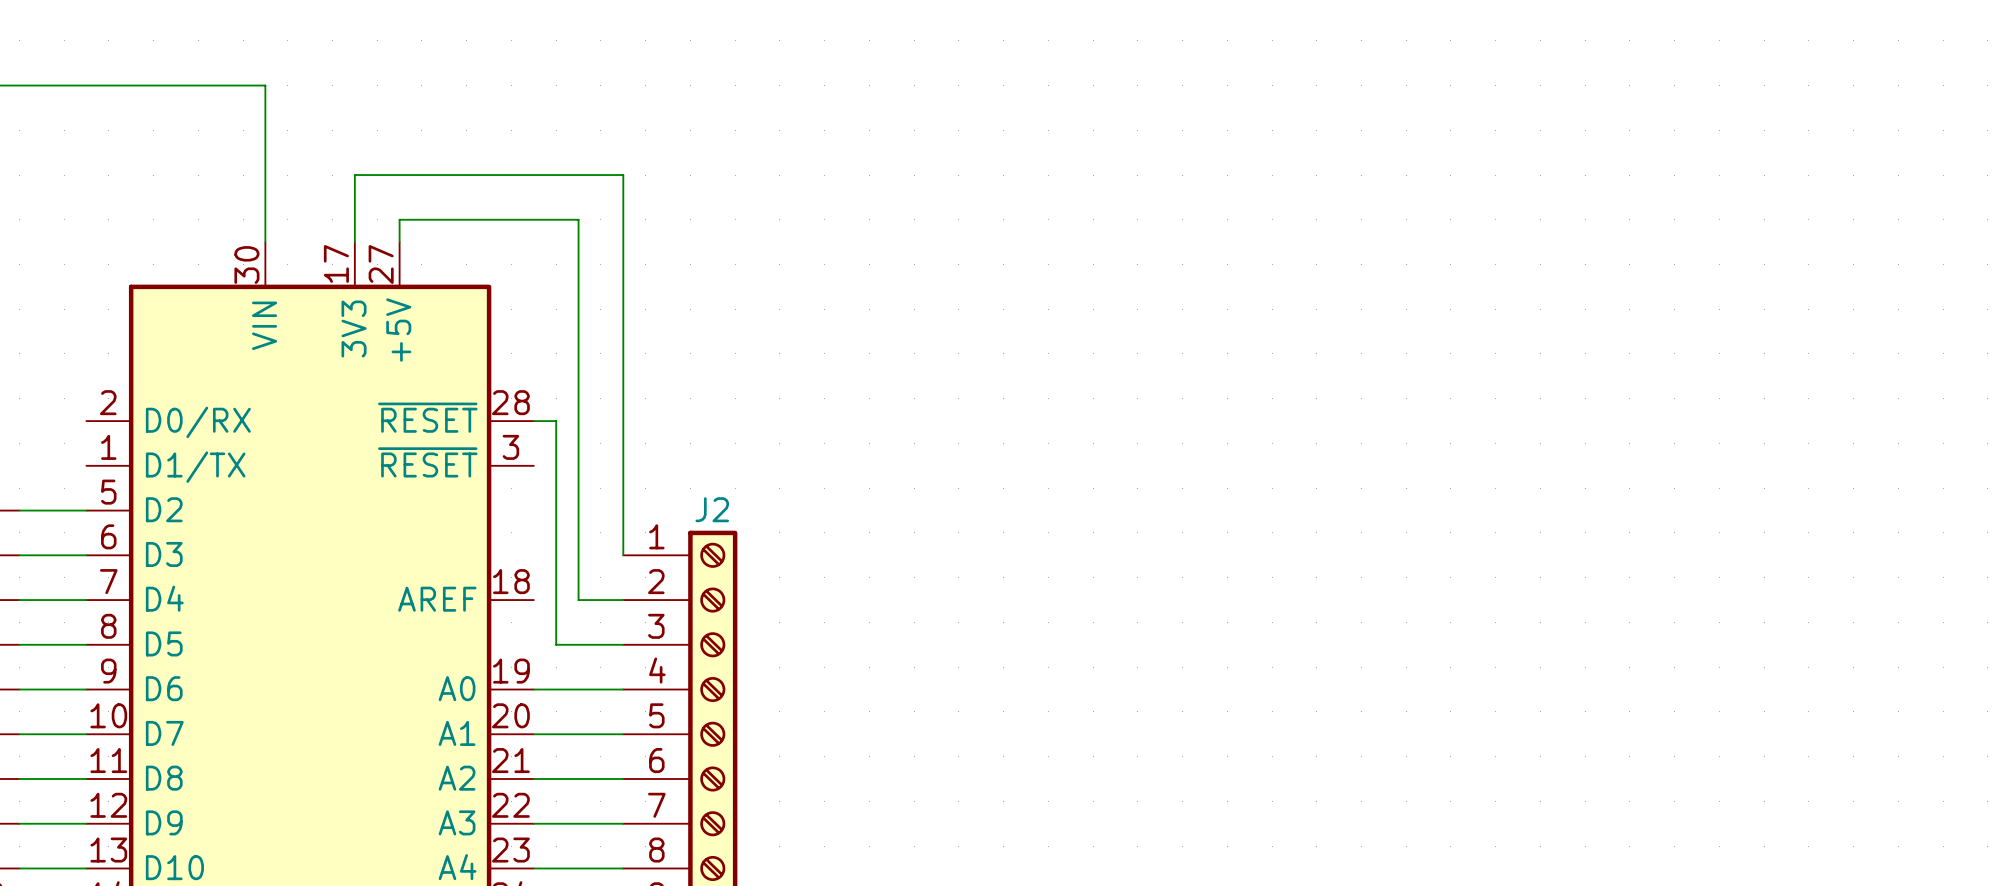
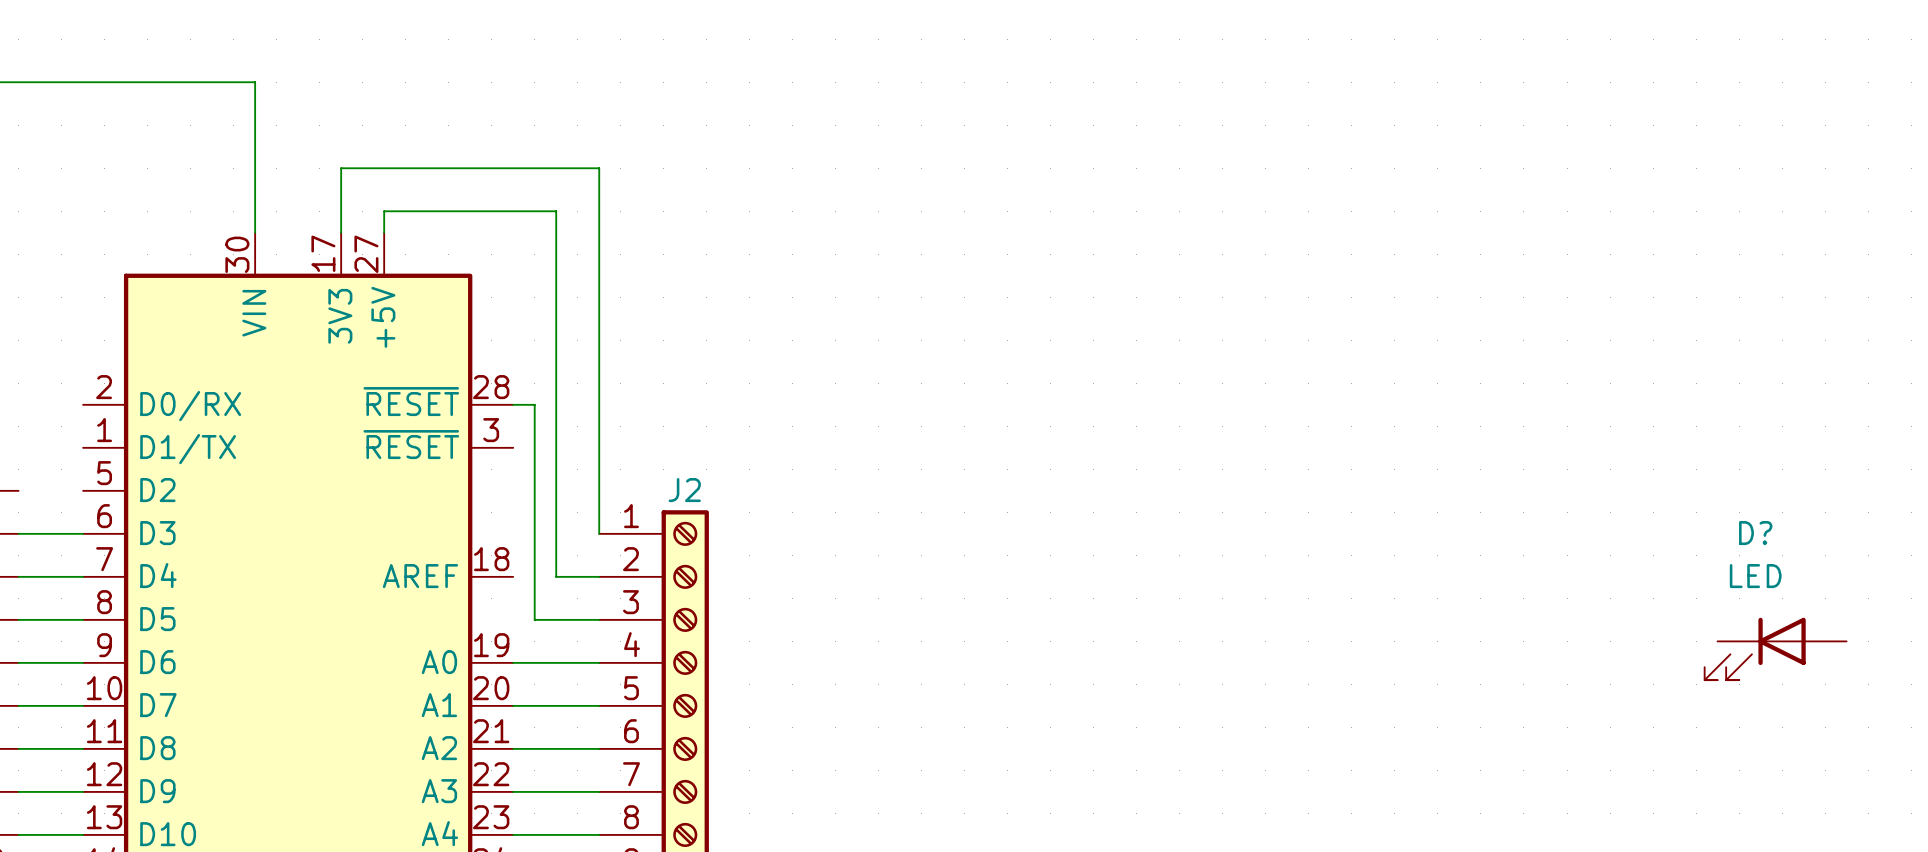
wire: (19, 510) (86, 510) -> none
D?: none -> LED (1775, 648)

